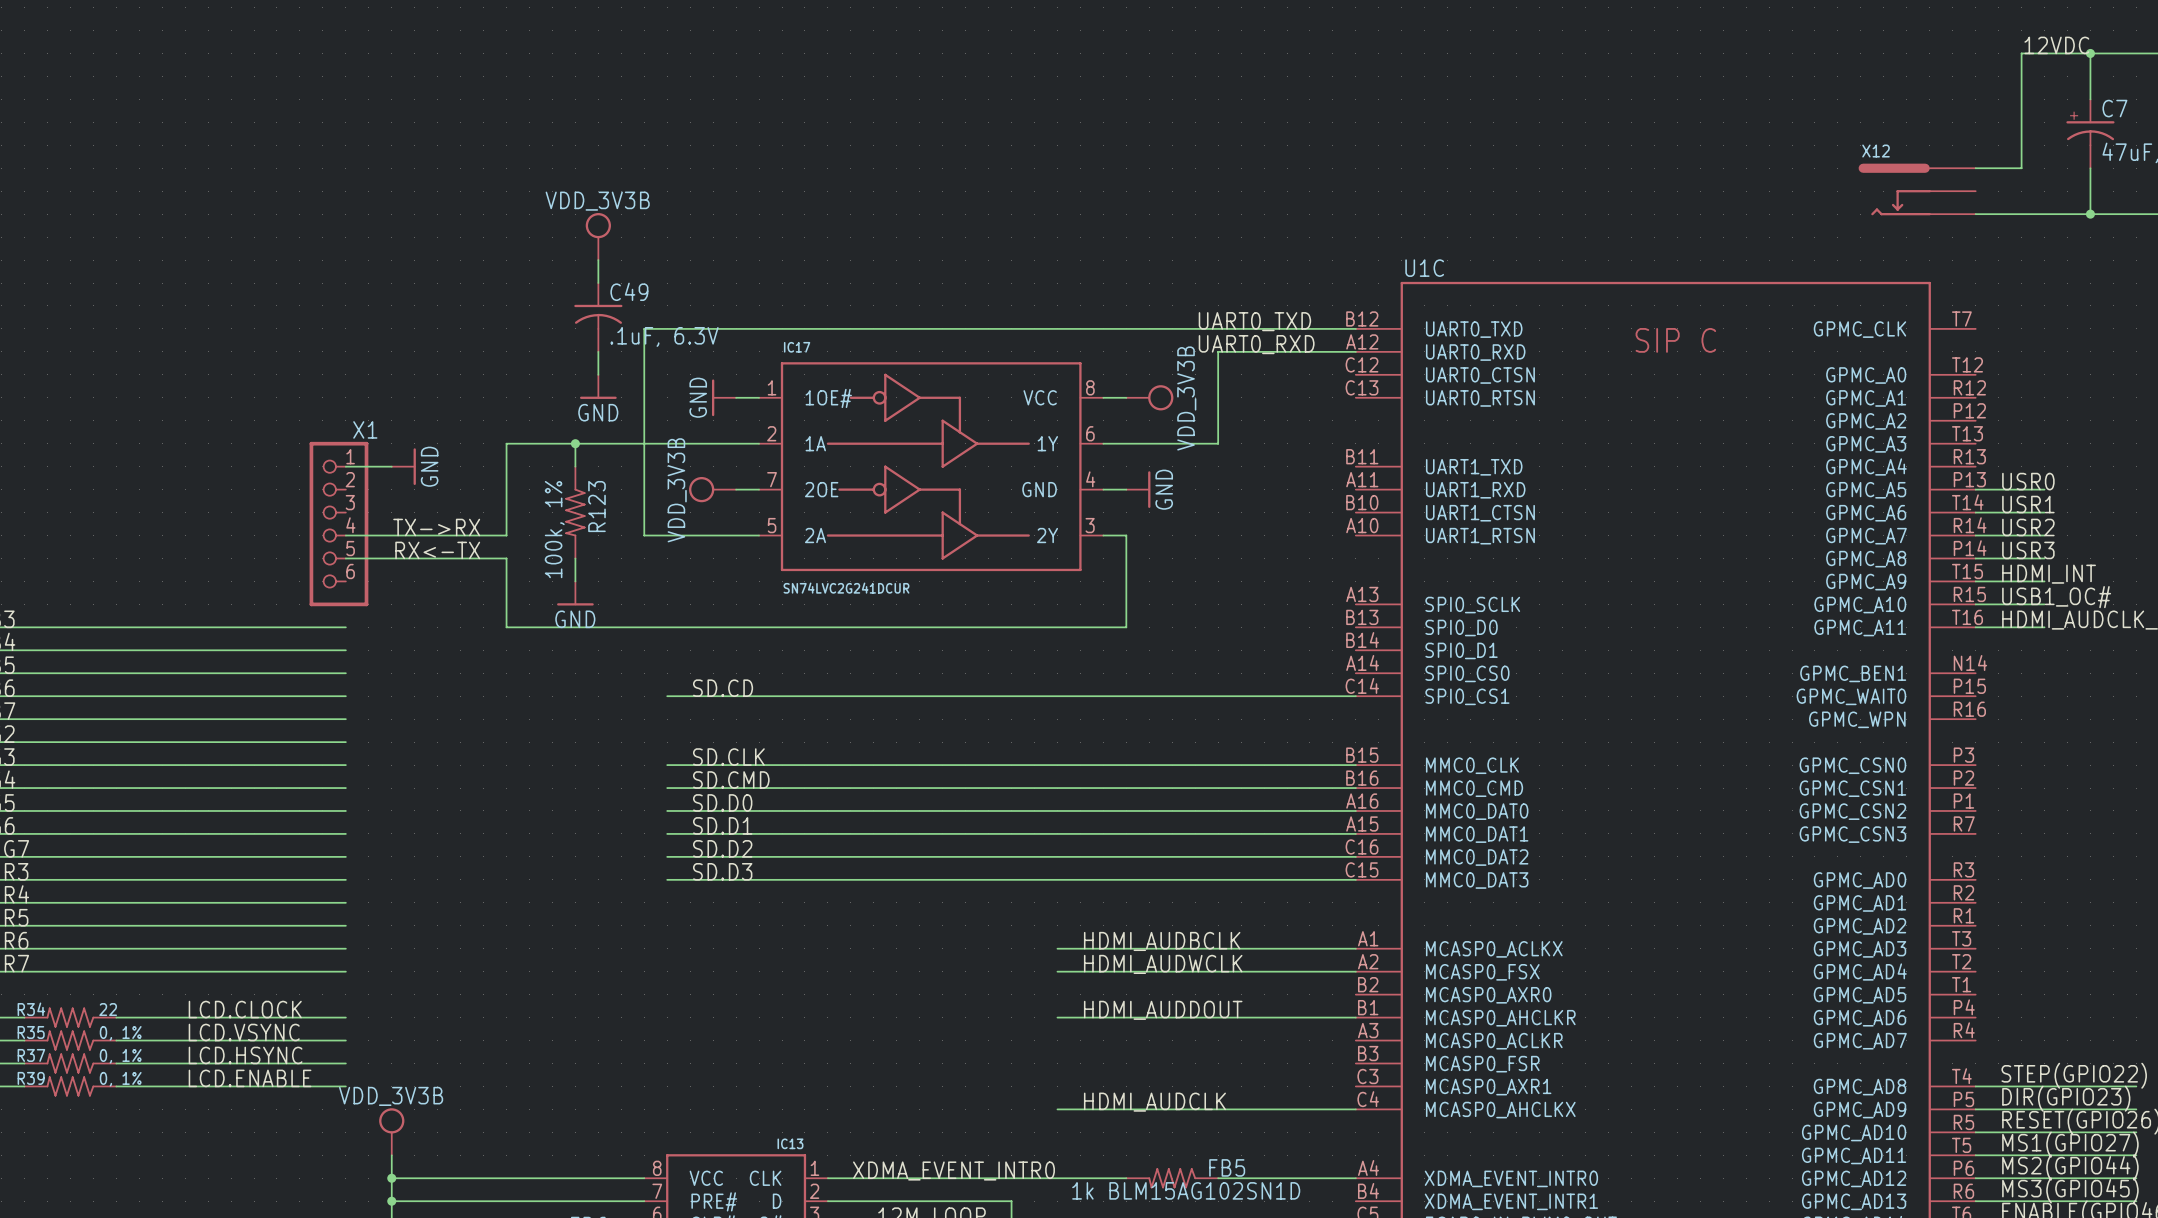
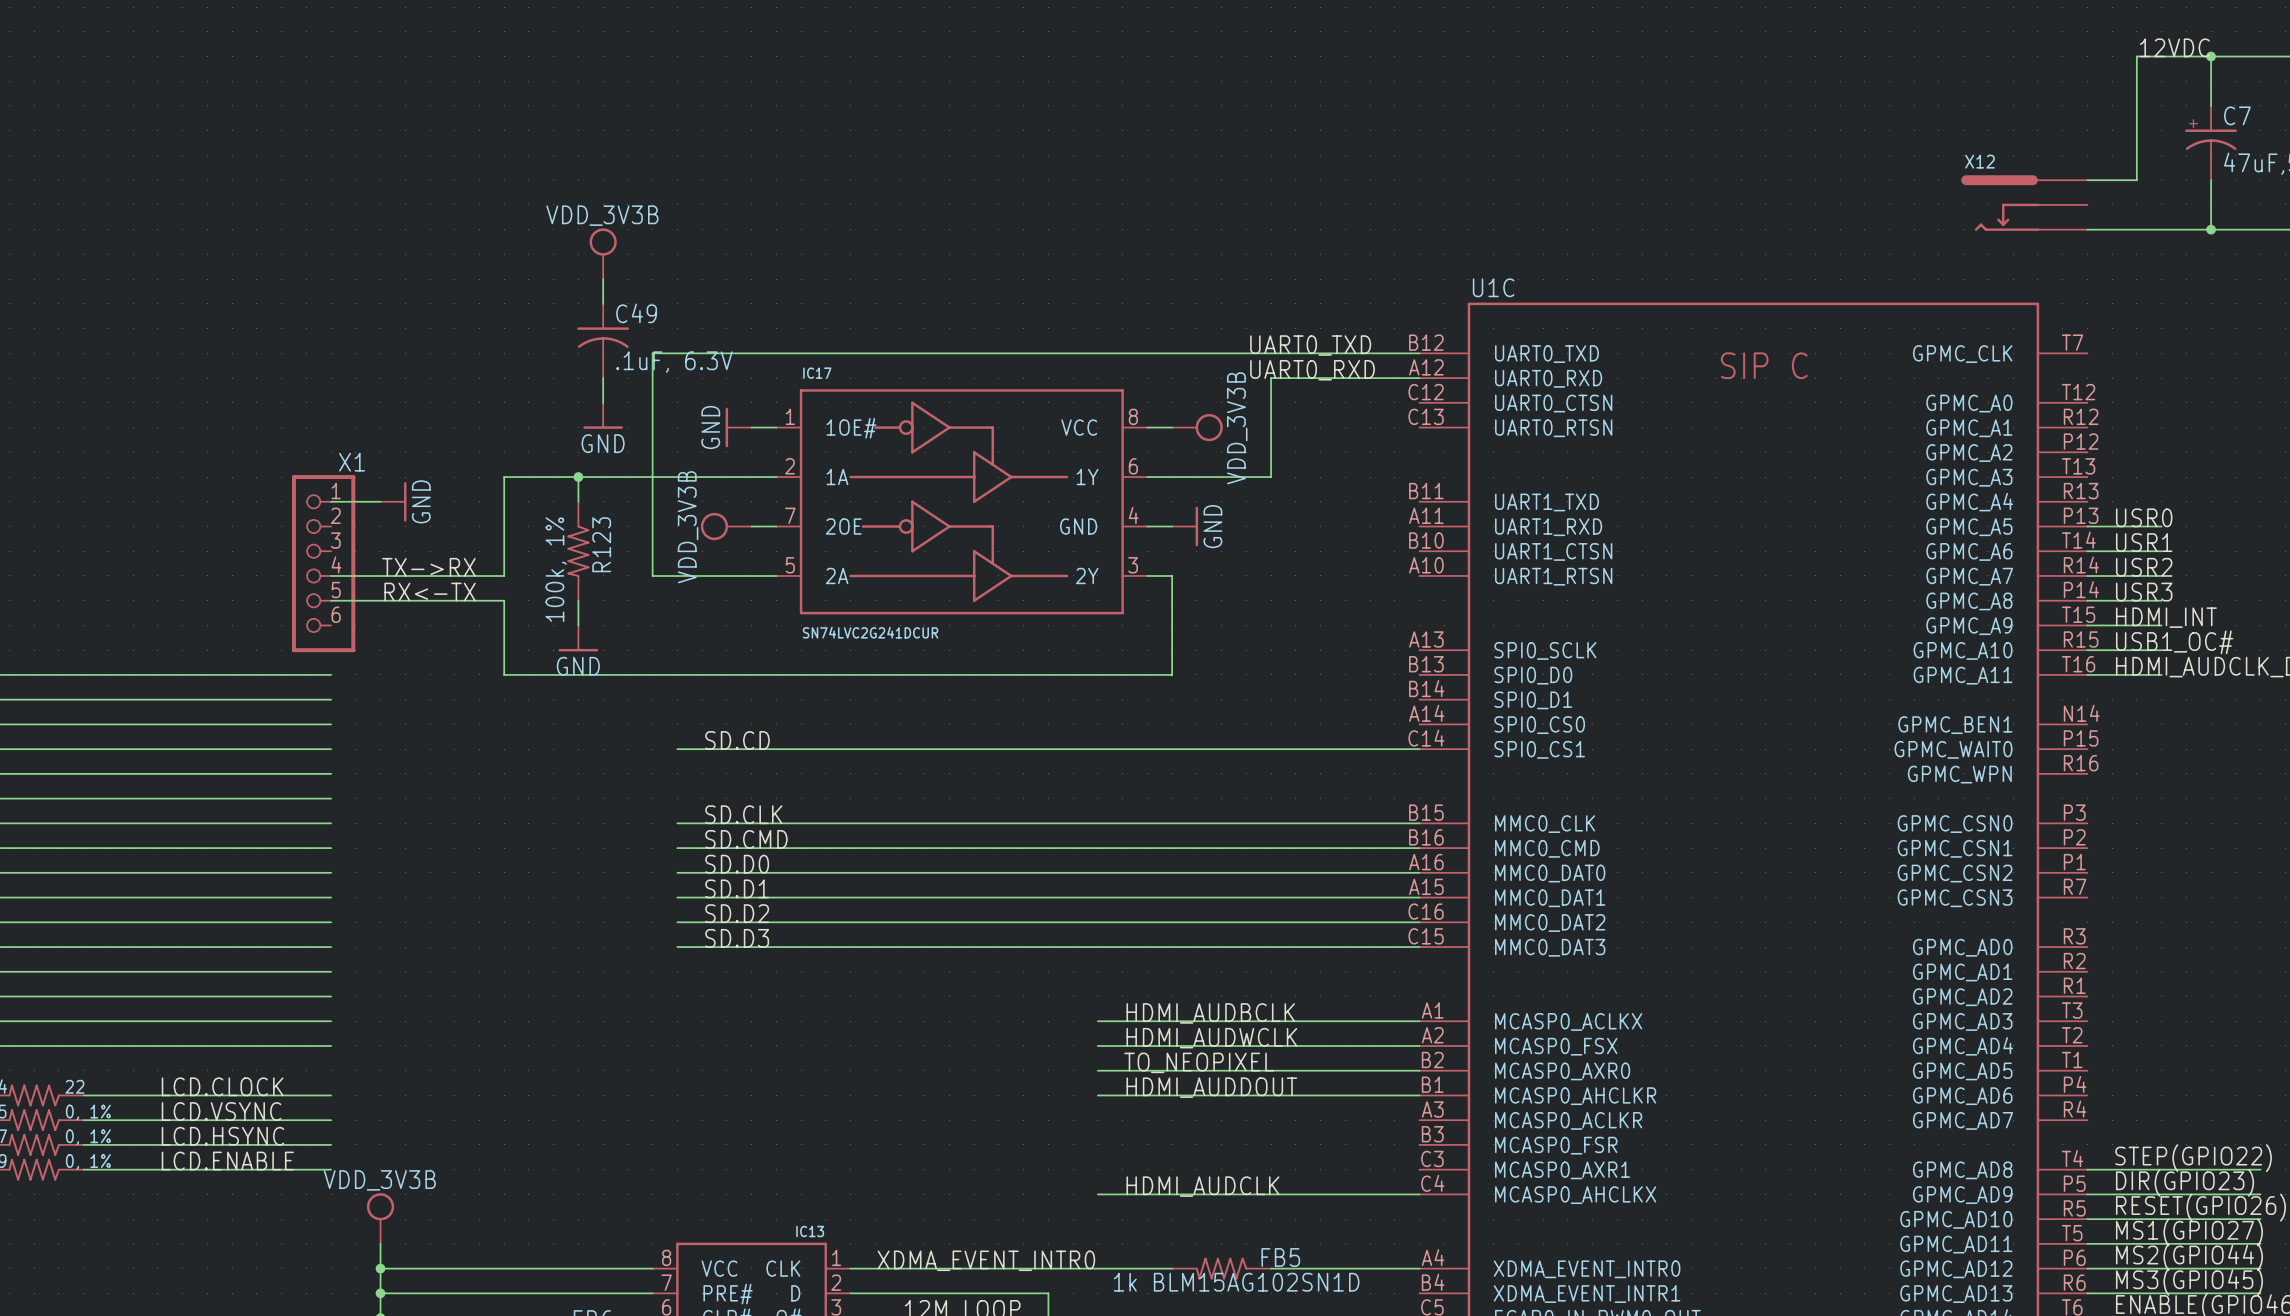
label: none -> TO_NEOPIXEL (1199, 1062)
wire: none -> (1097, 1070) (1419, 1070)

